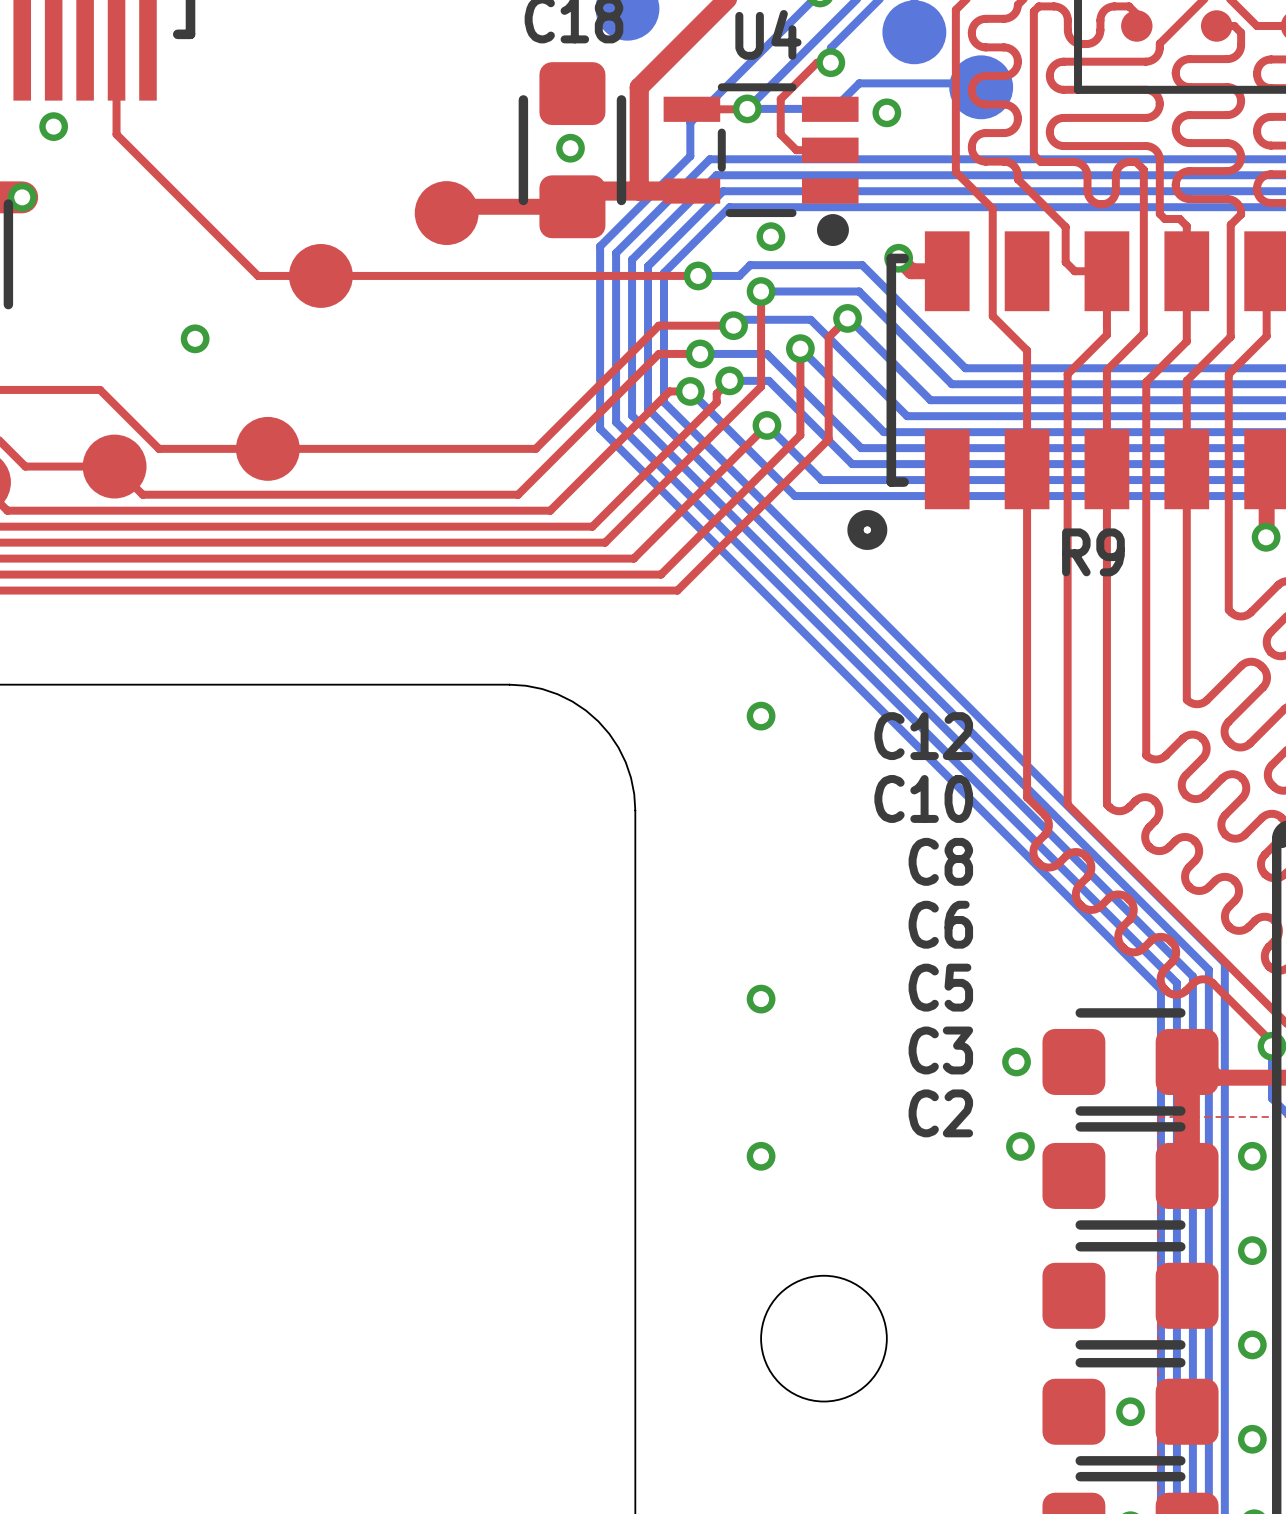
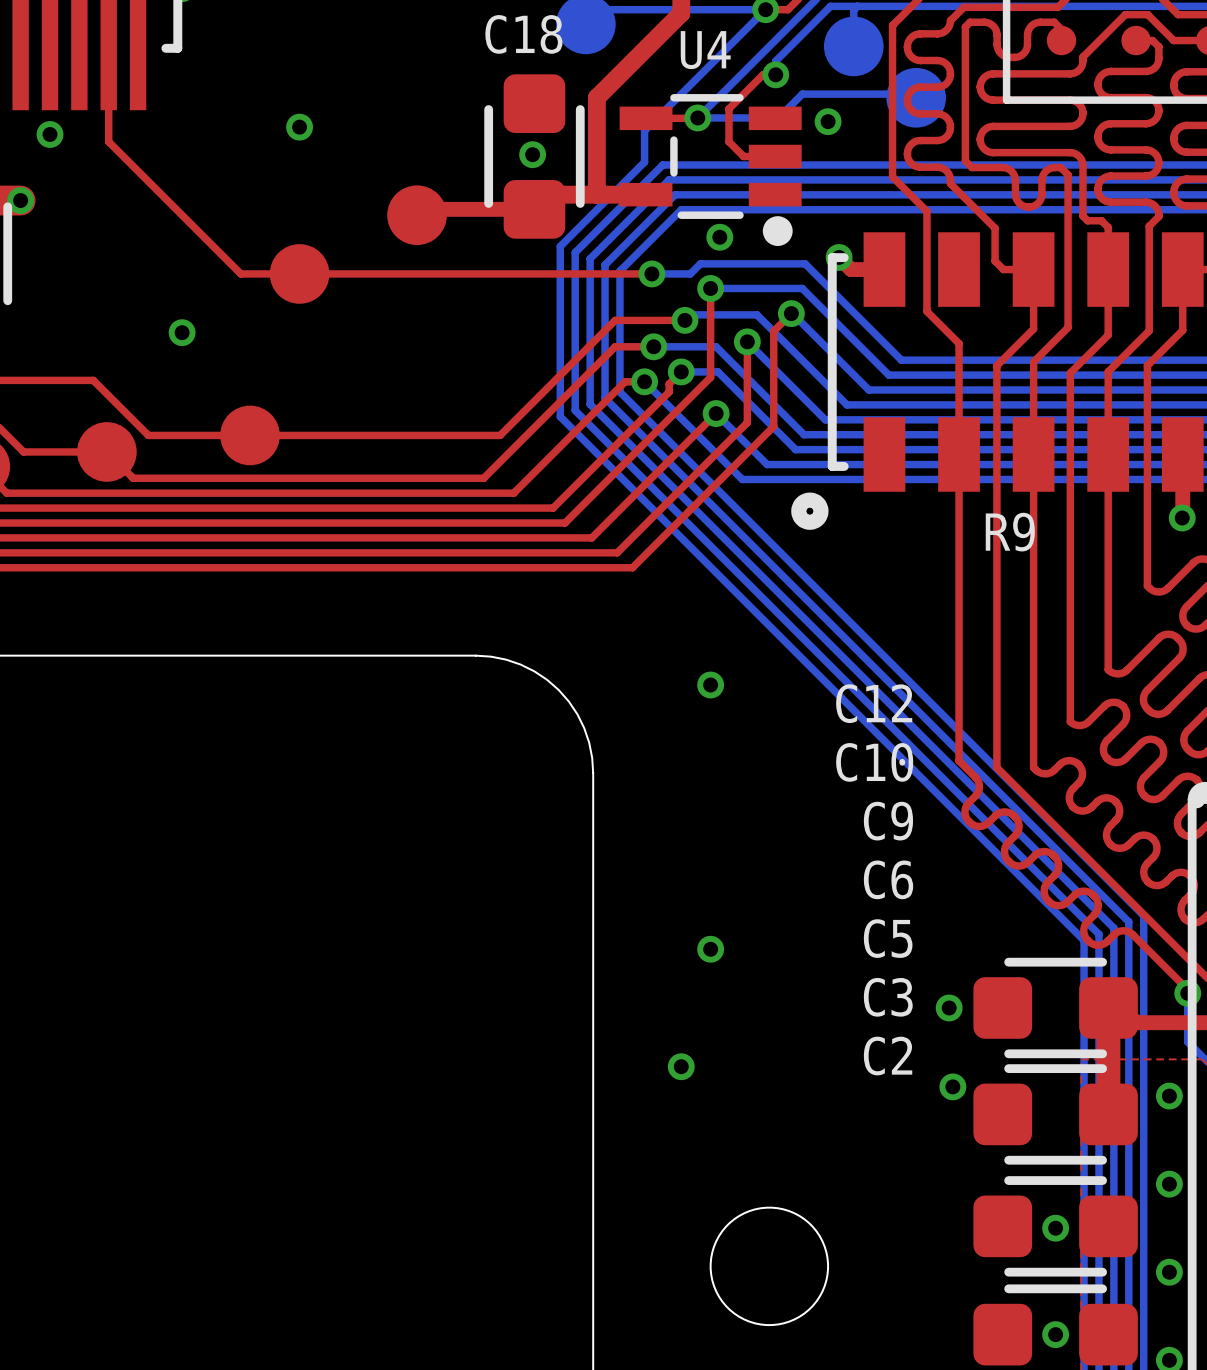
via: none -> (299, 127)
C8 name: C8 (940, 861) -> C9 (888, 821)
via position: (761, 1156) -> (681, 1066)
via: none -> (1055, 1228)

